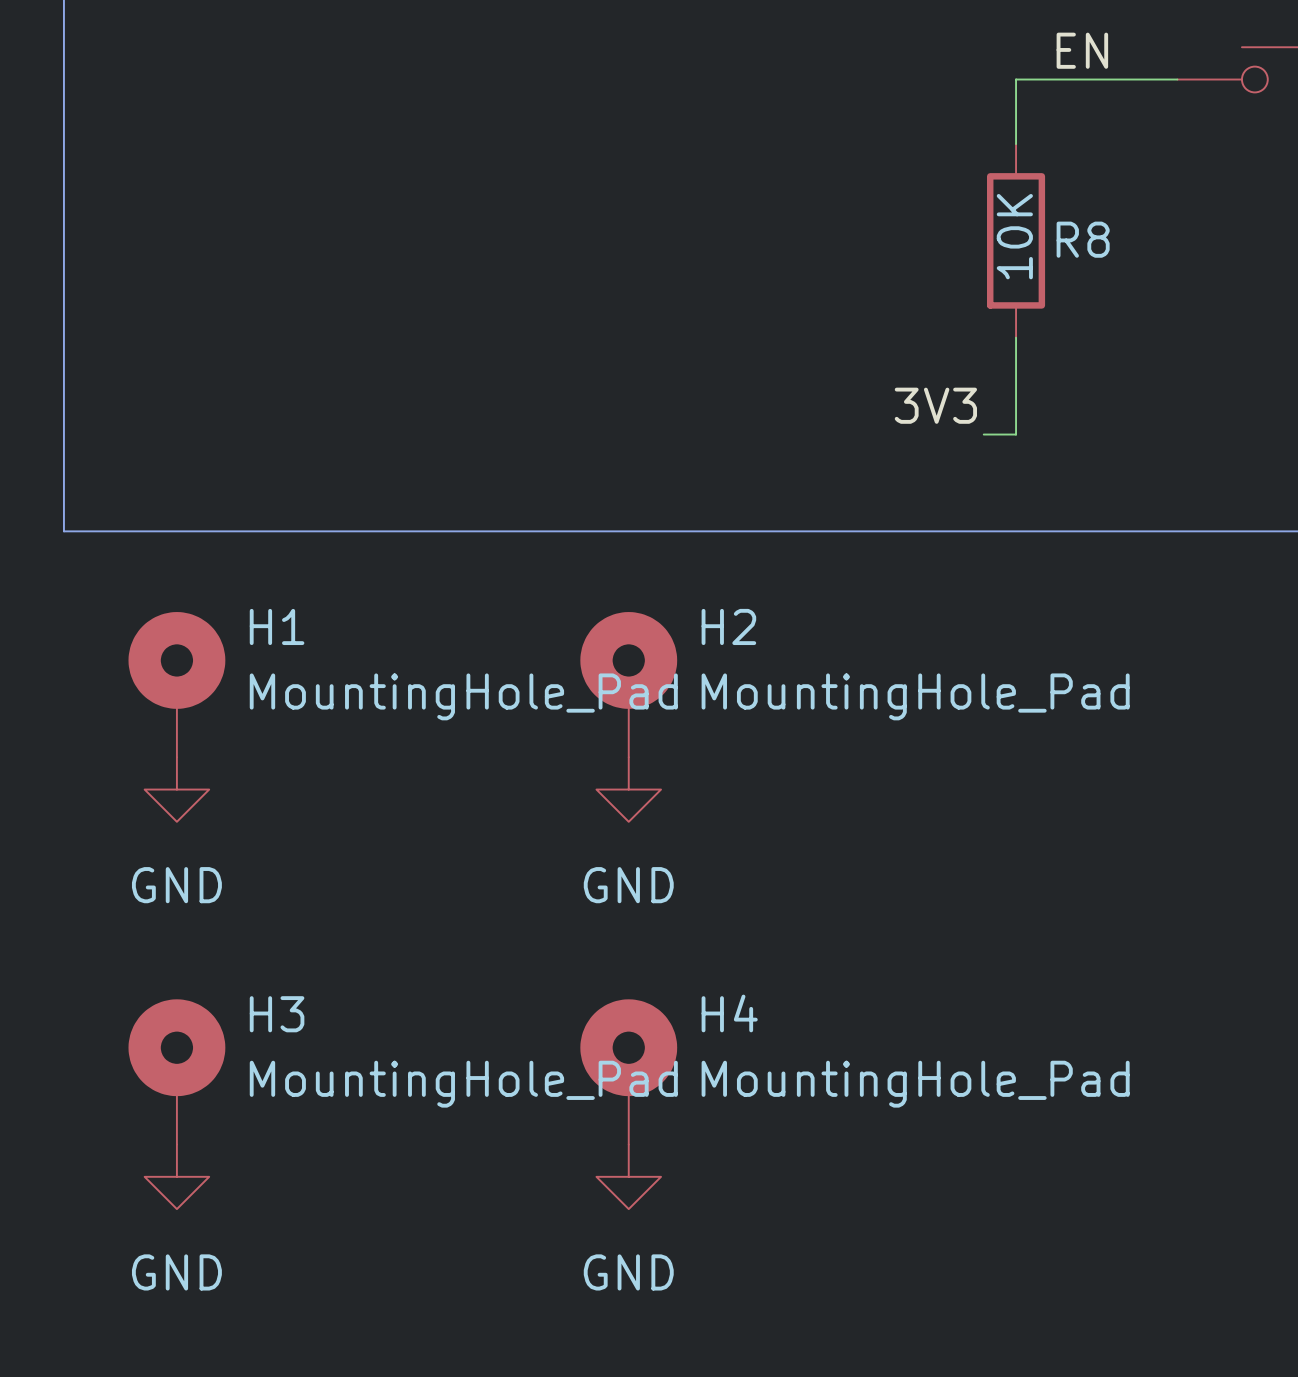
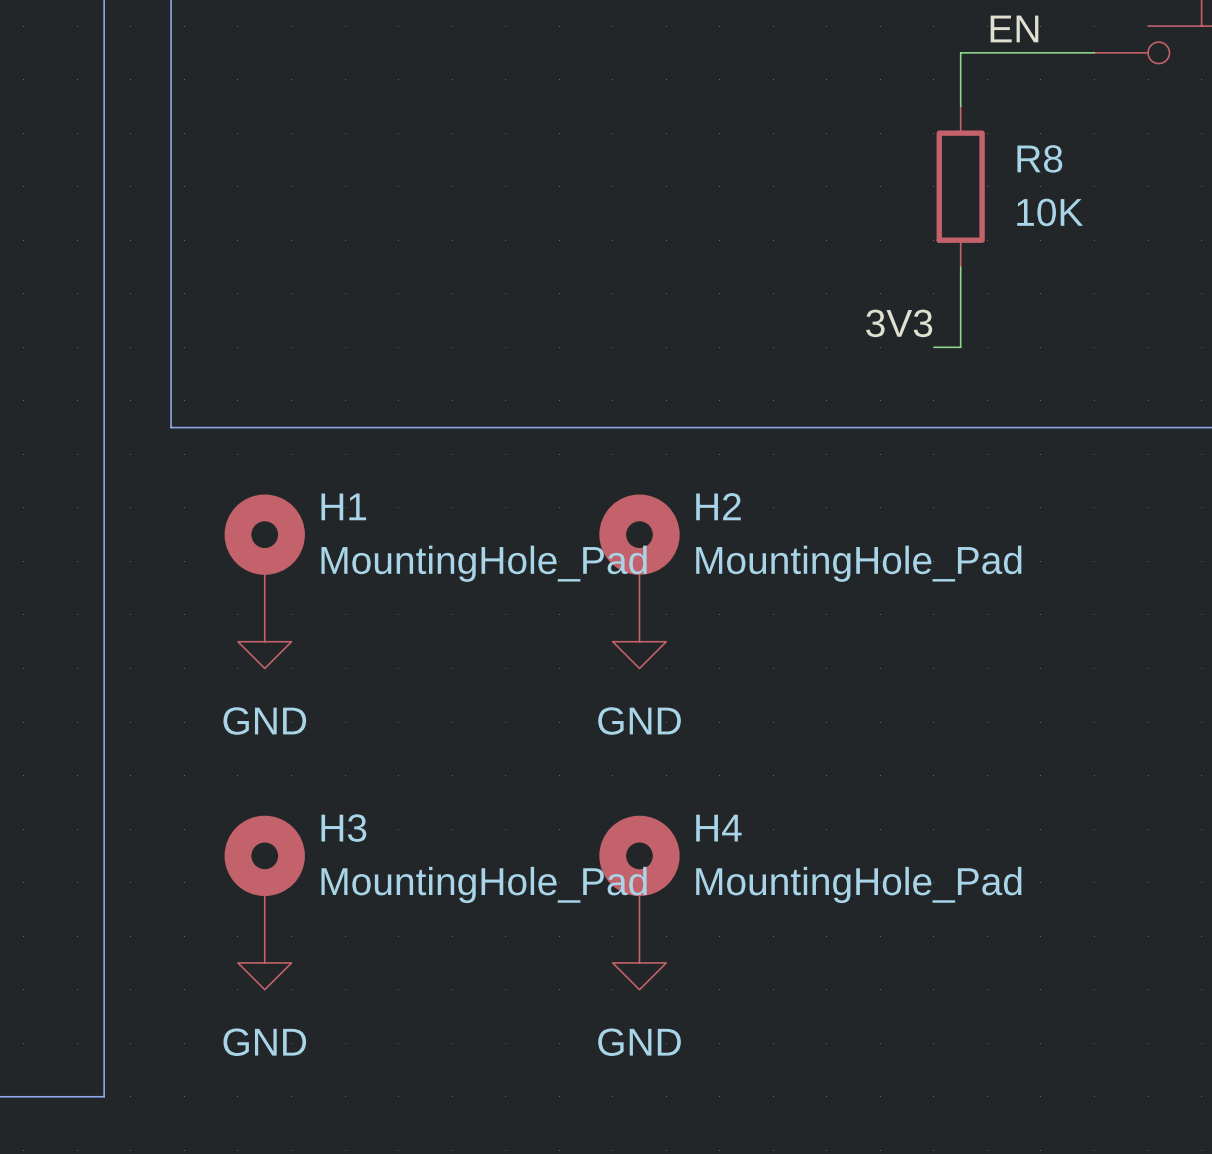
R8 value rotation: 0° (1014, 236) -> 90° clockwise (1050, 212)
R8 value position: 10K (1014, 236) -> 10K (1050, 212)
R8 name position: R8 (1083, 239) -> R8 (1039, 158)

